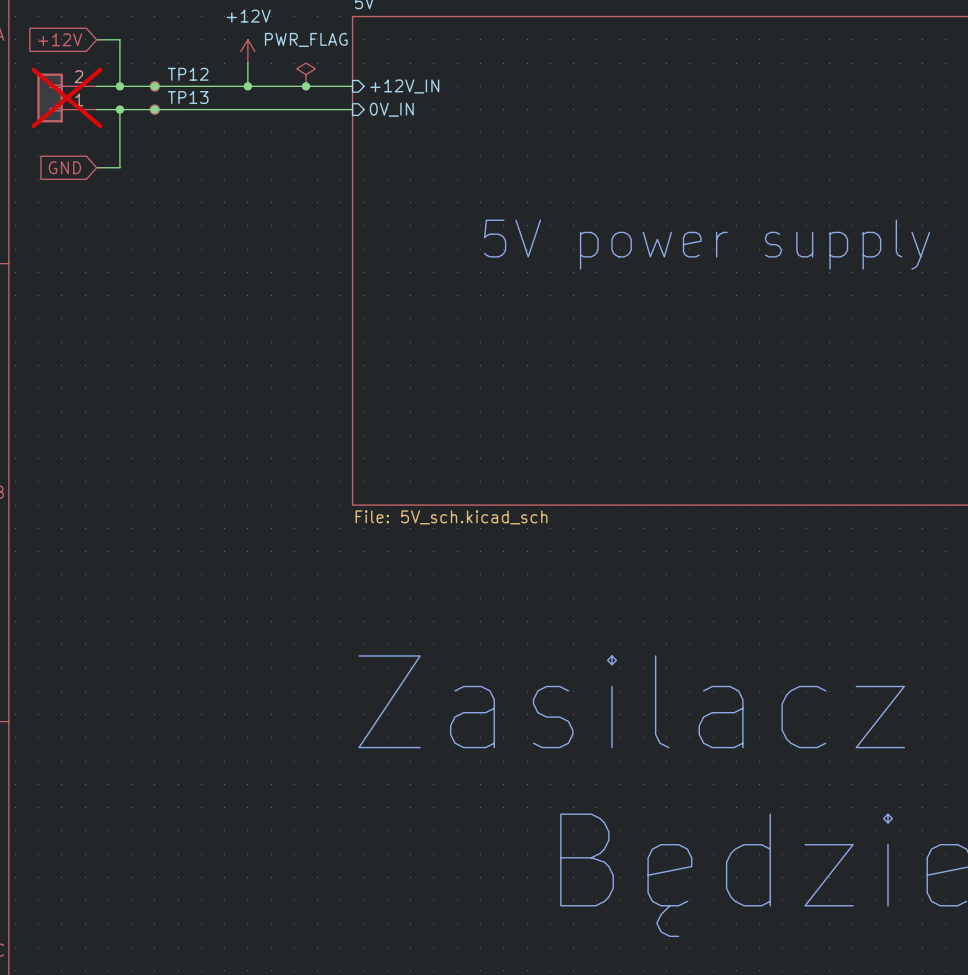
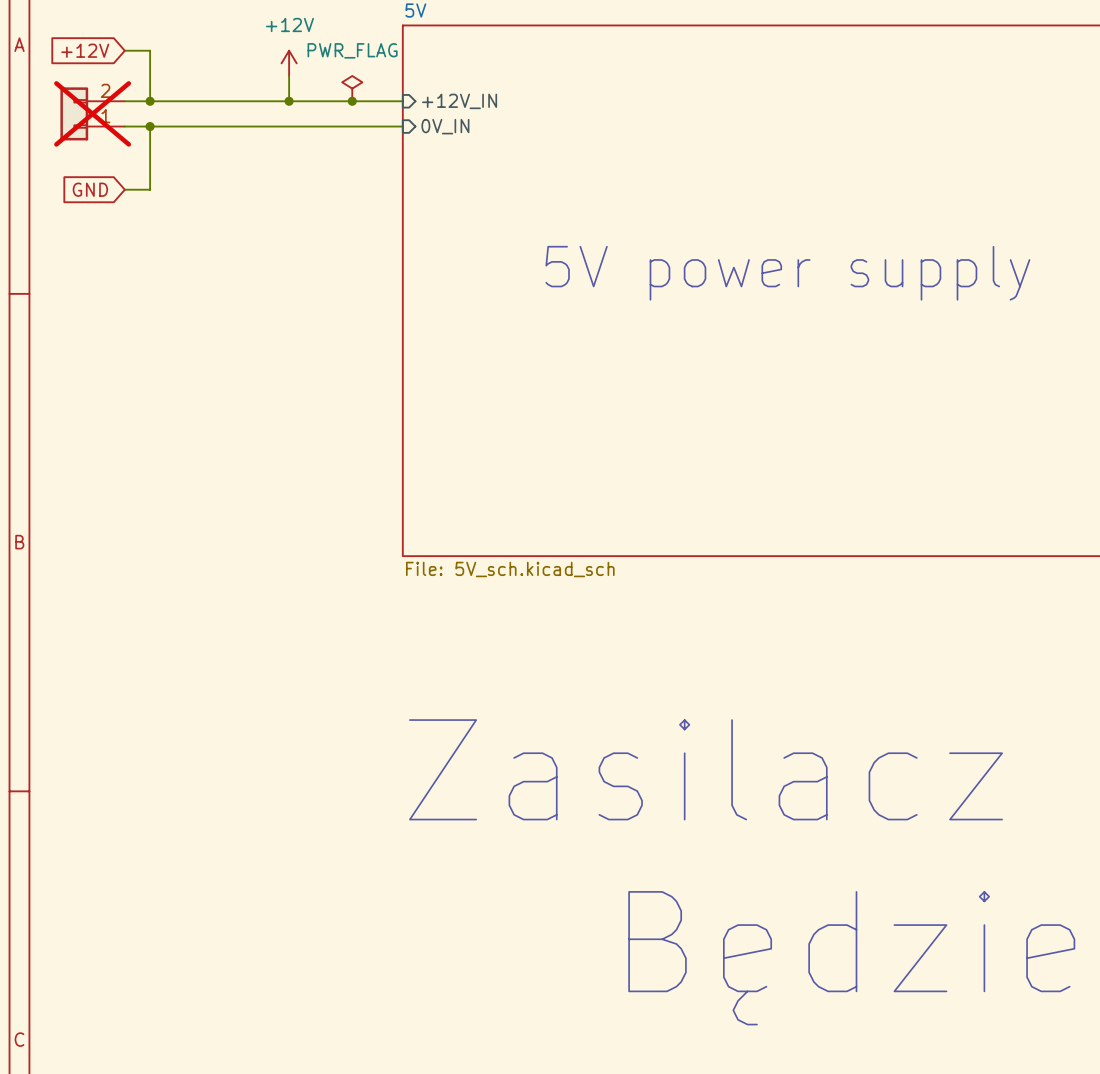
junction: (154, 86) -> none
TP12: (154, 86) -> none
junction: (154, 109) -> none
TP13: (154, 109) -> none

